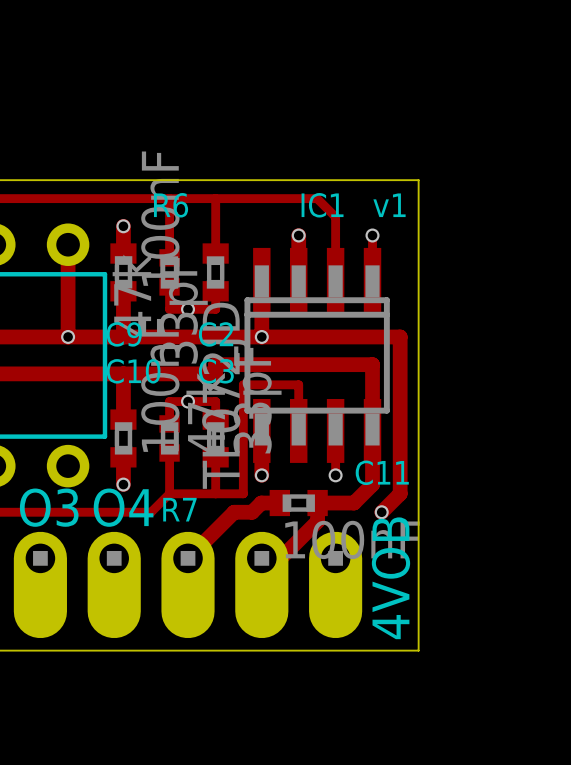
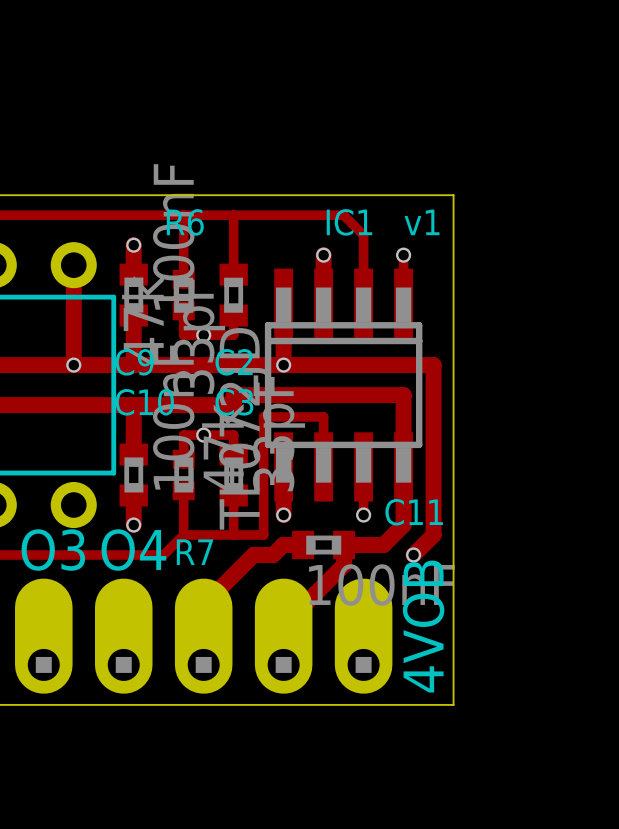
part rotation: 0° (40, 584) -> 180° (43, 636)
part rotation: 0° (114, 584) -> 180° (123, 636)
part rotation: 0° (188, 584) -> 180° (203, 636)
part rotation: 0° (261, 584) -> 180° (283, 636)
part rotation: 0° (335, 584) -> 180° (363, 636)

